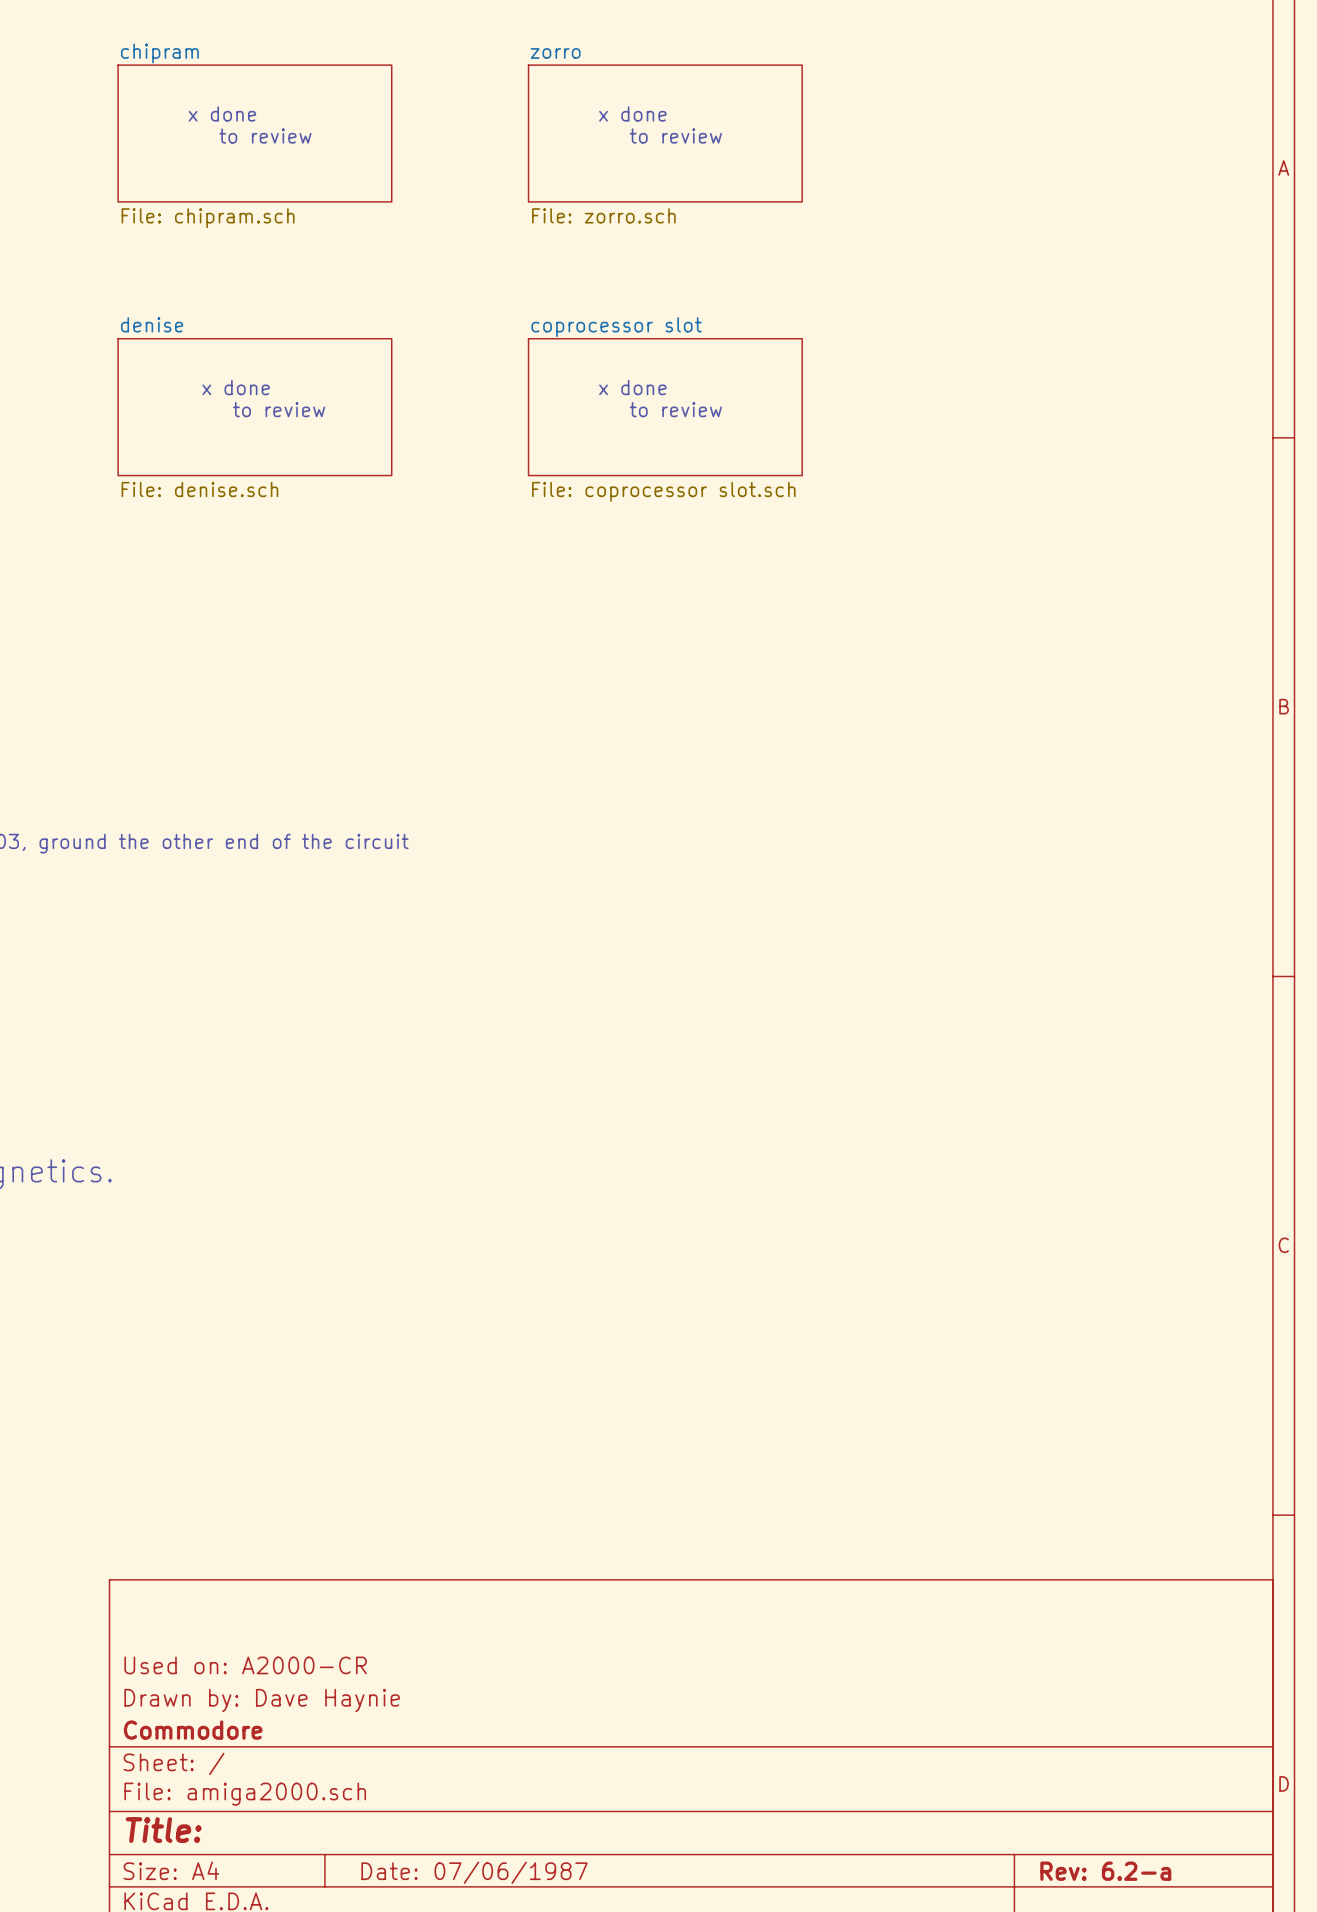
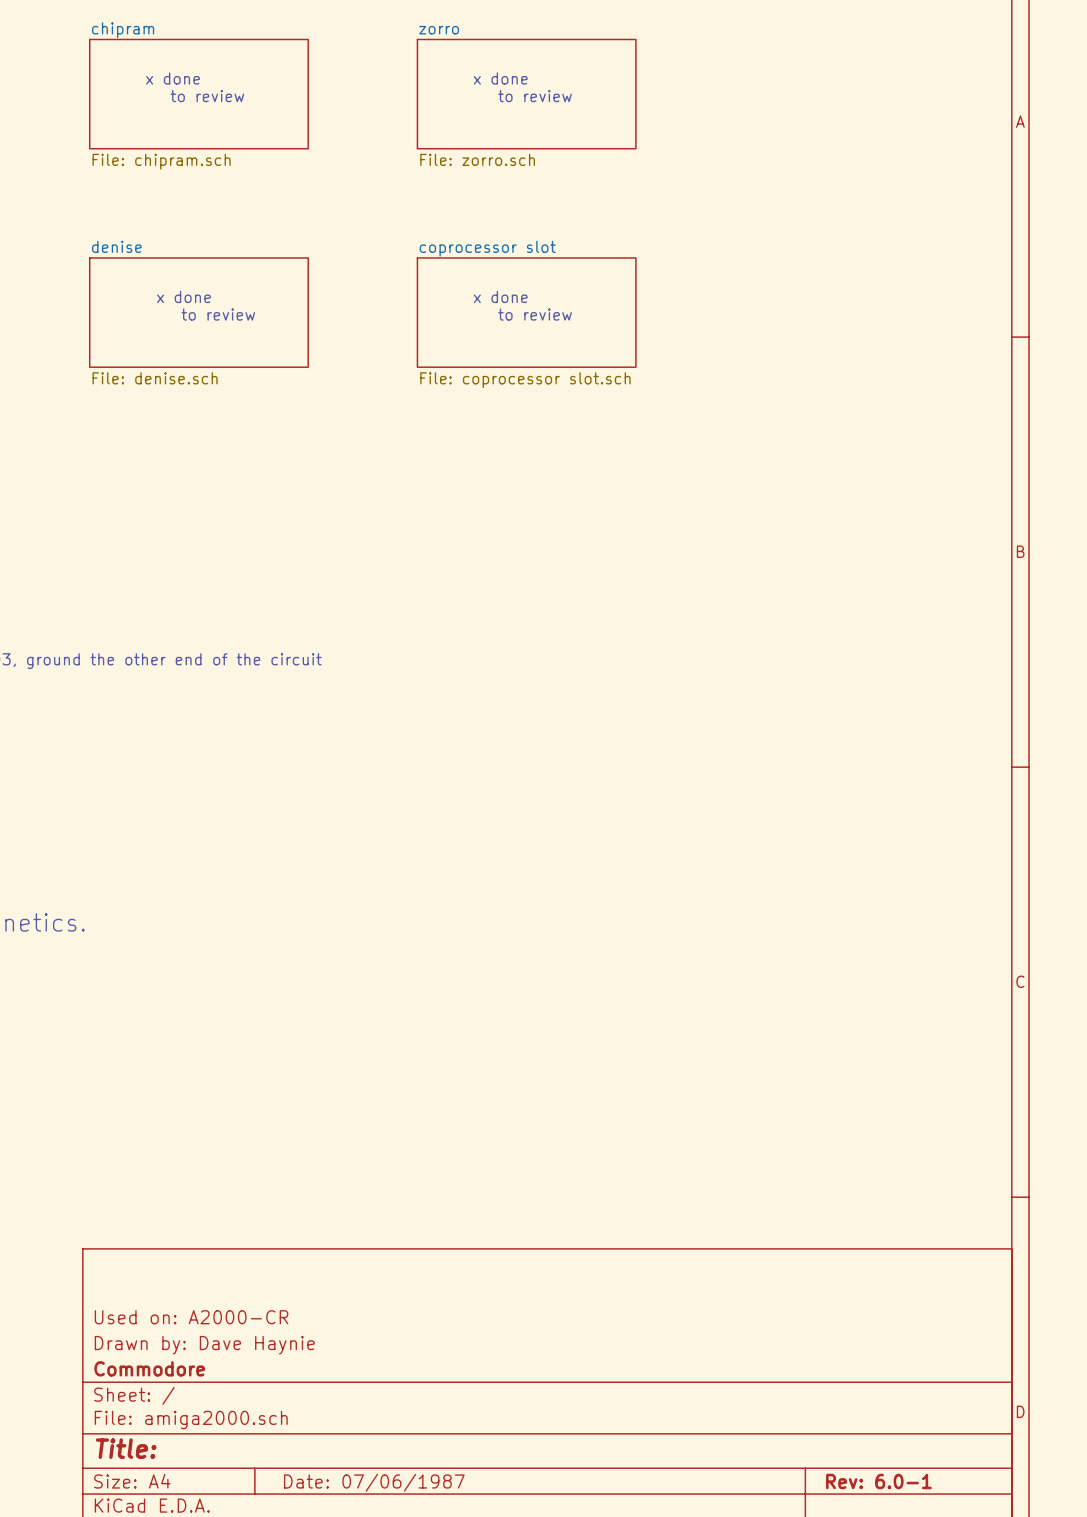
title block: Rev: 6.2-a (1105, 1871) -> Rev: 6.0-1 (878, 1481)

